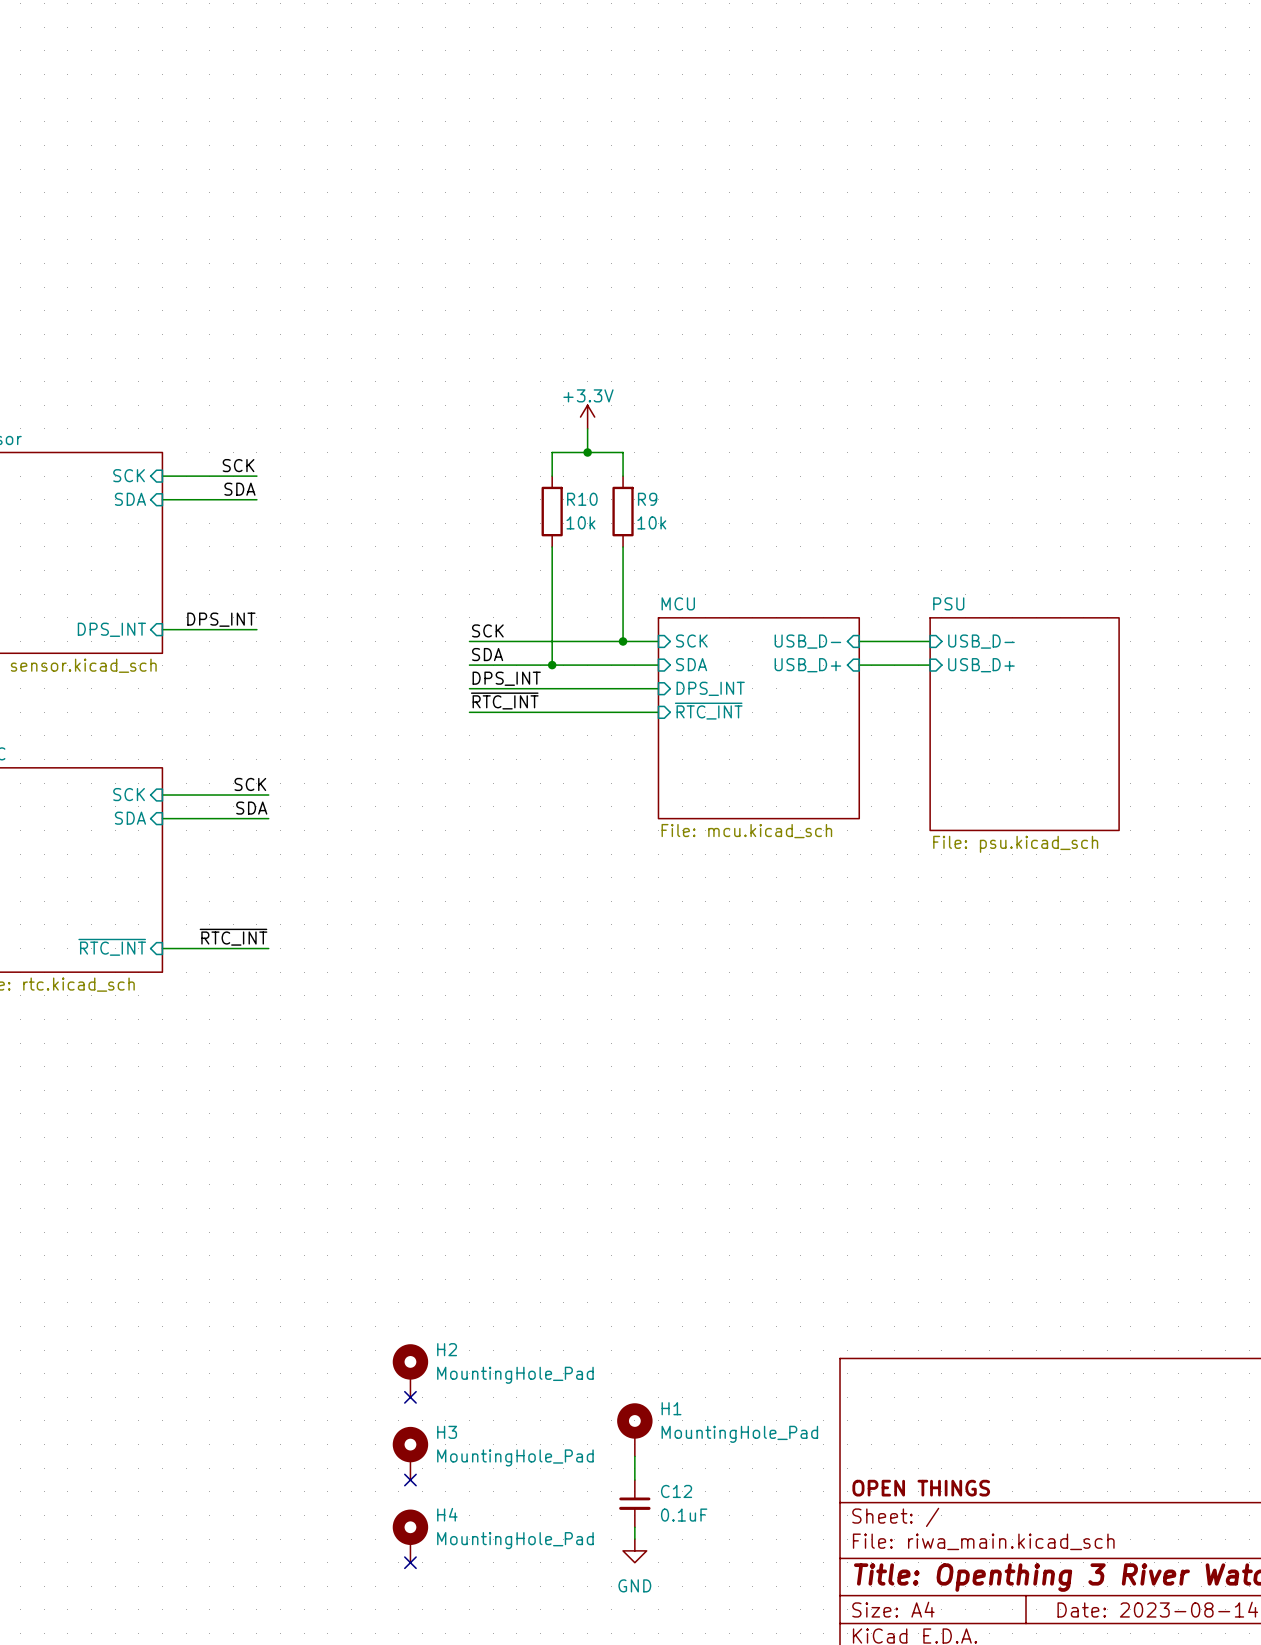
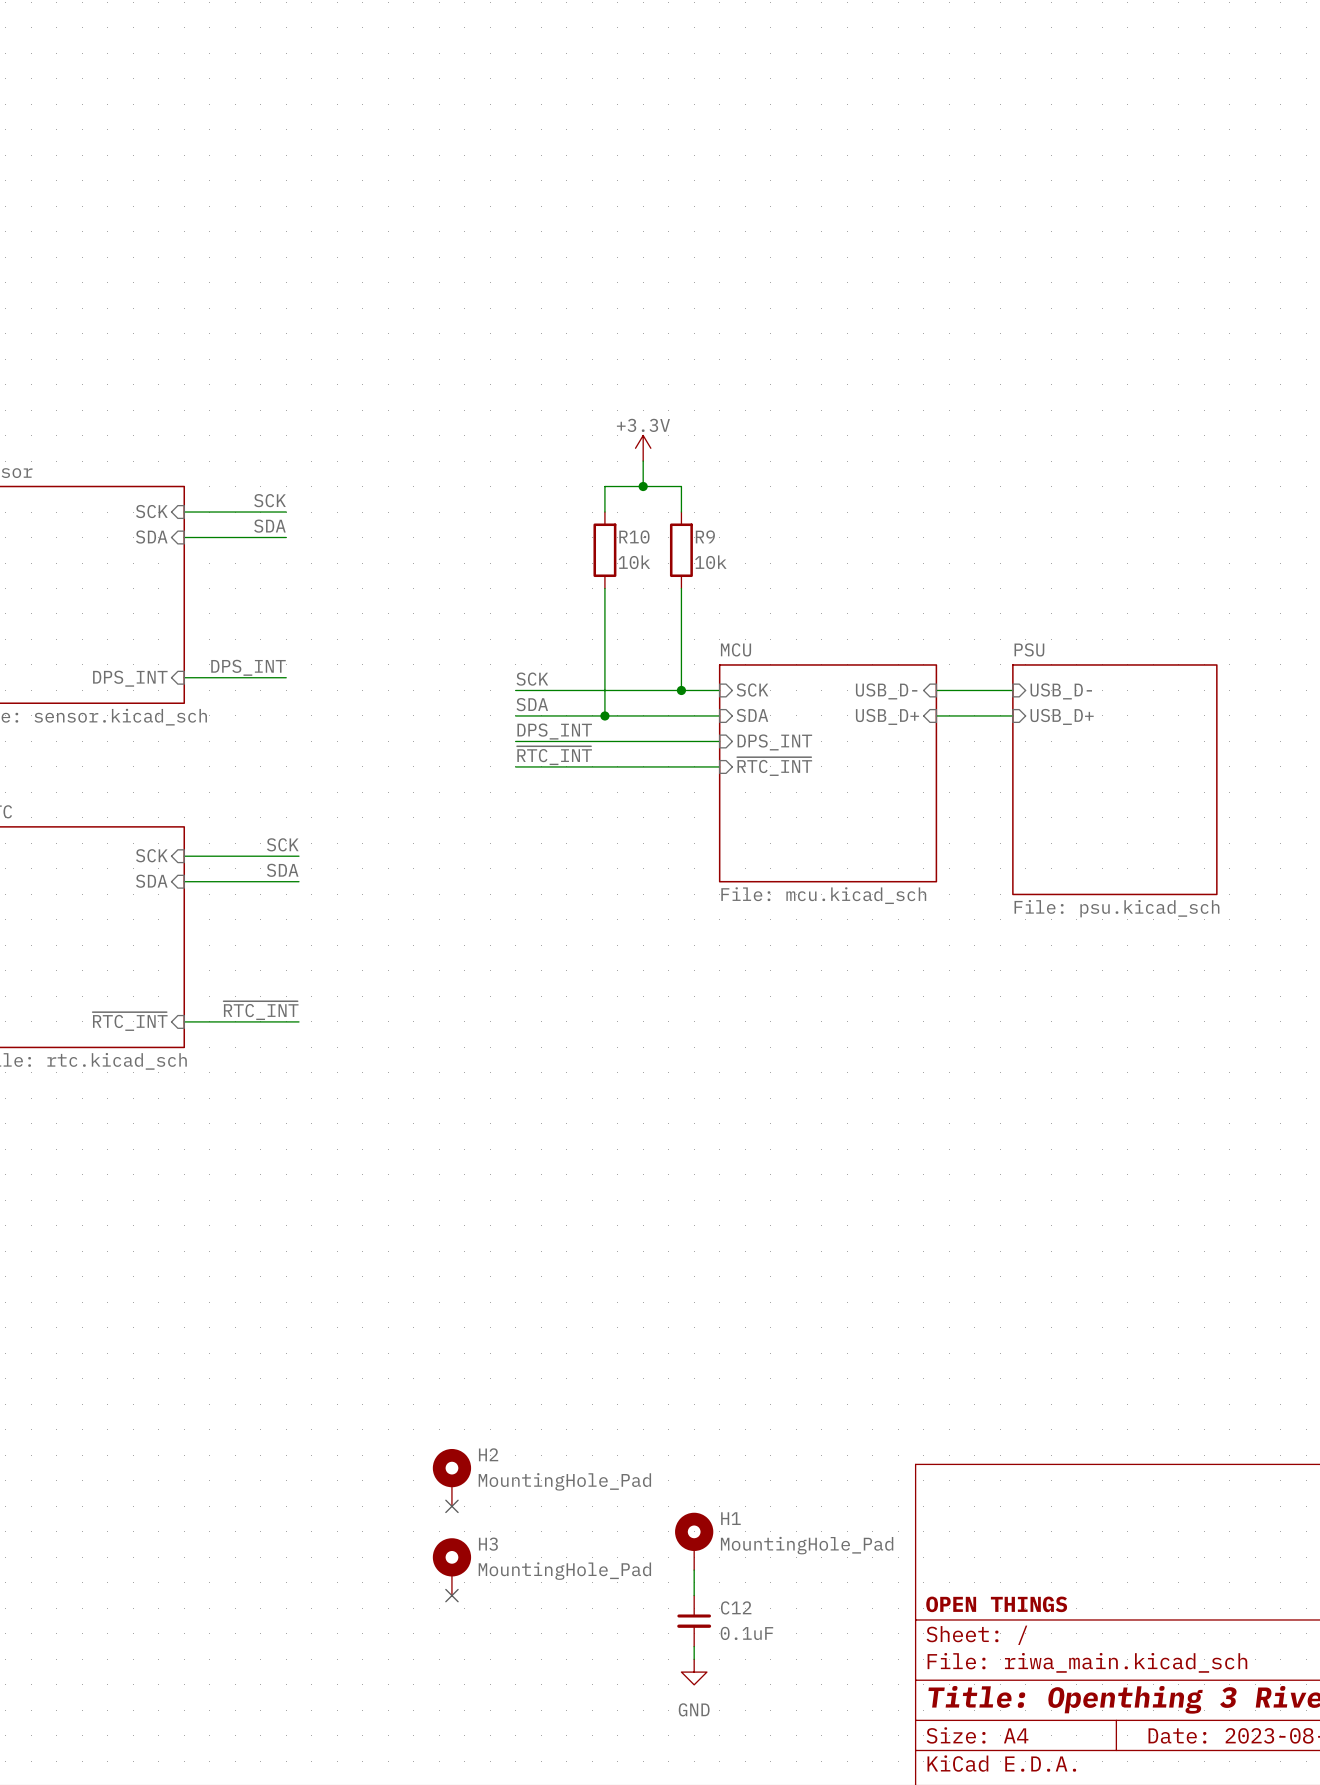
H4: MountingHole_Pad (410, 1536) -> none
no-connect mark: (410, 1562) -> none

